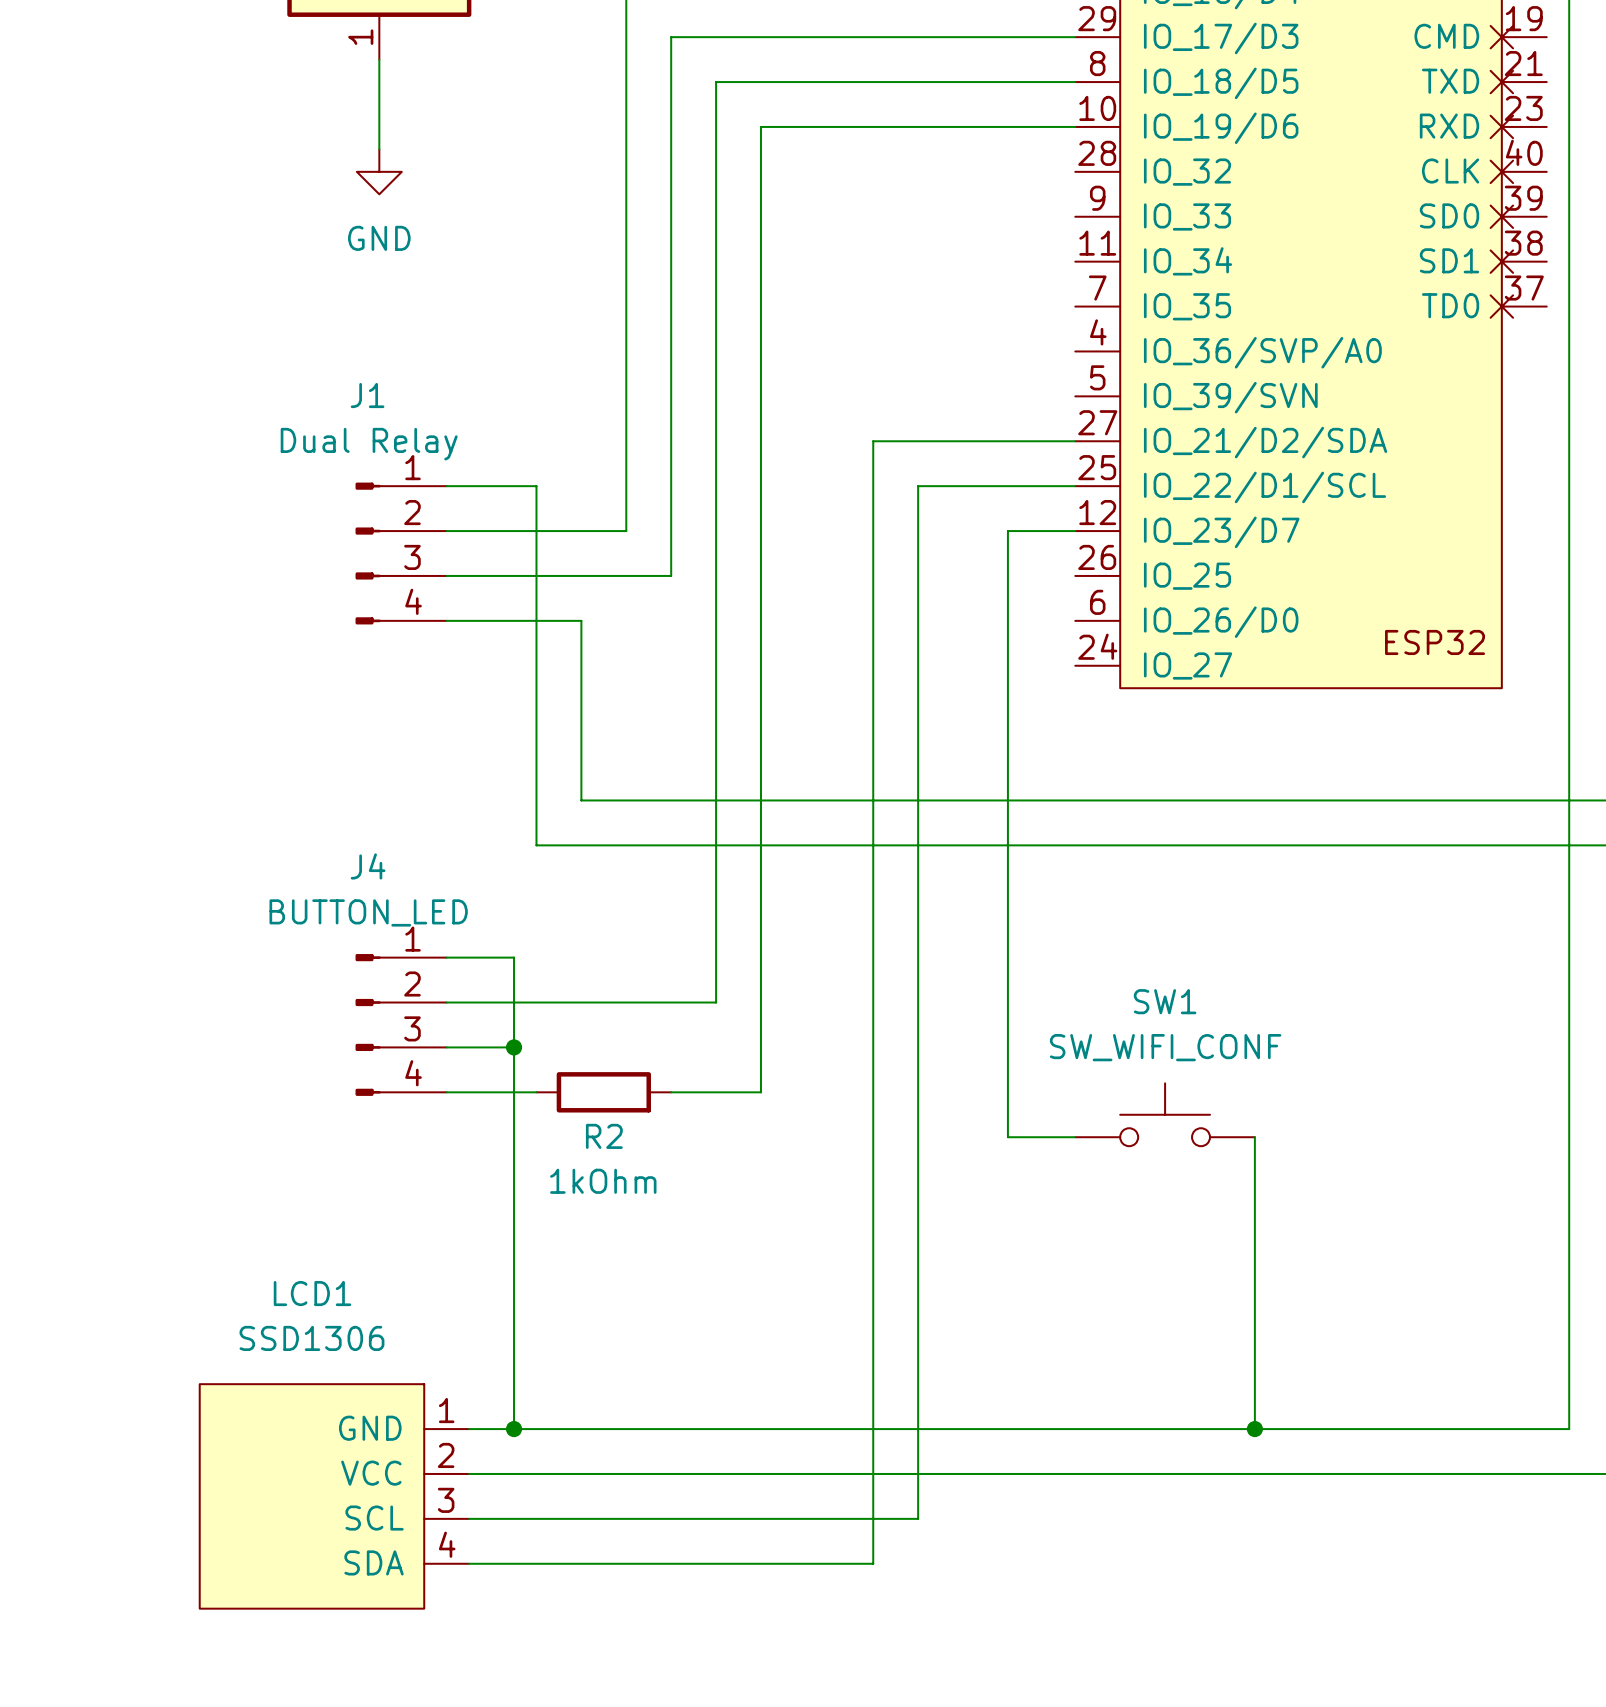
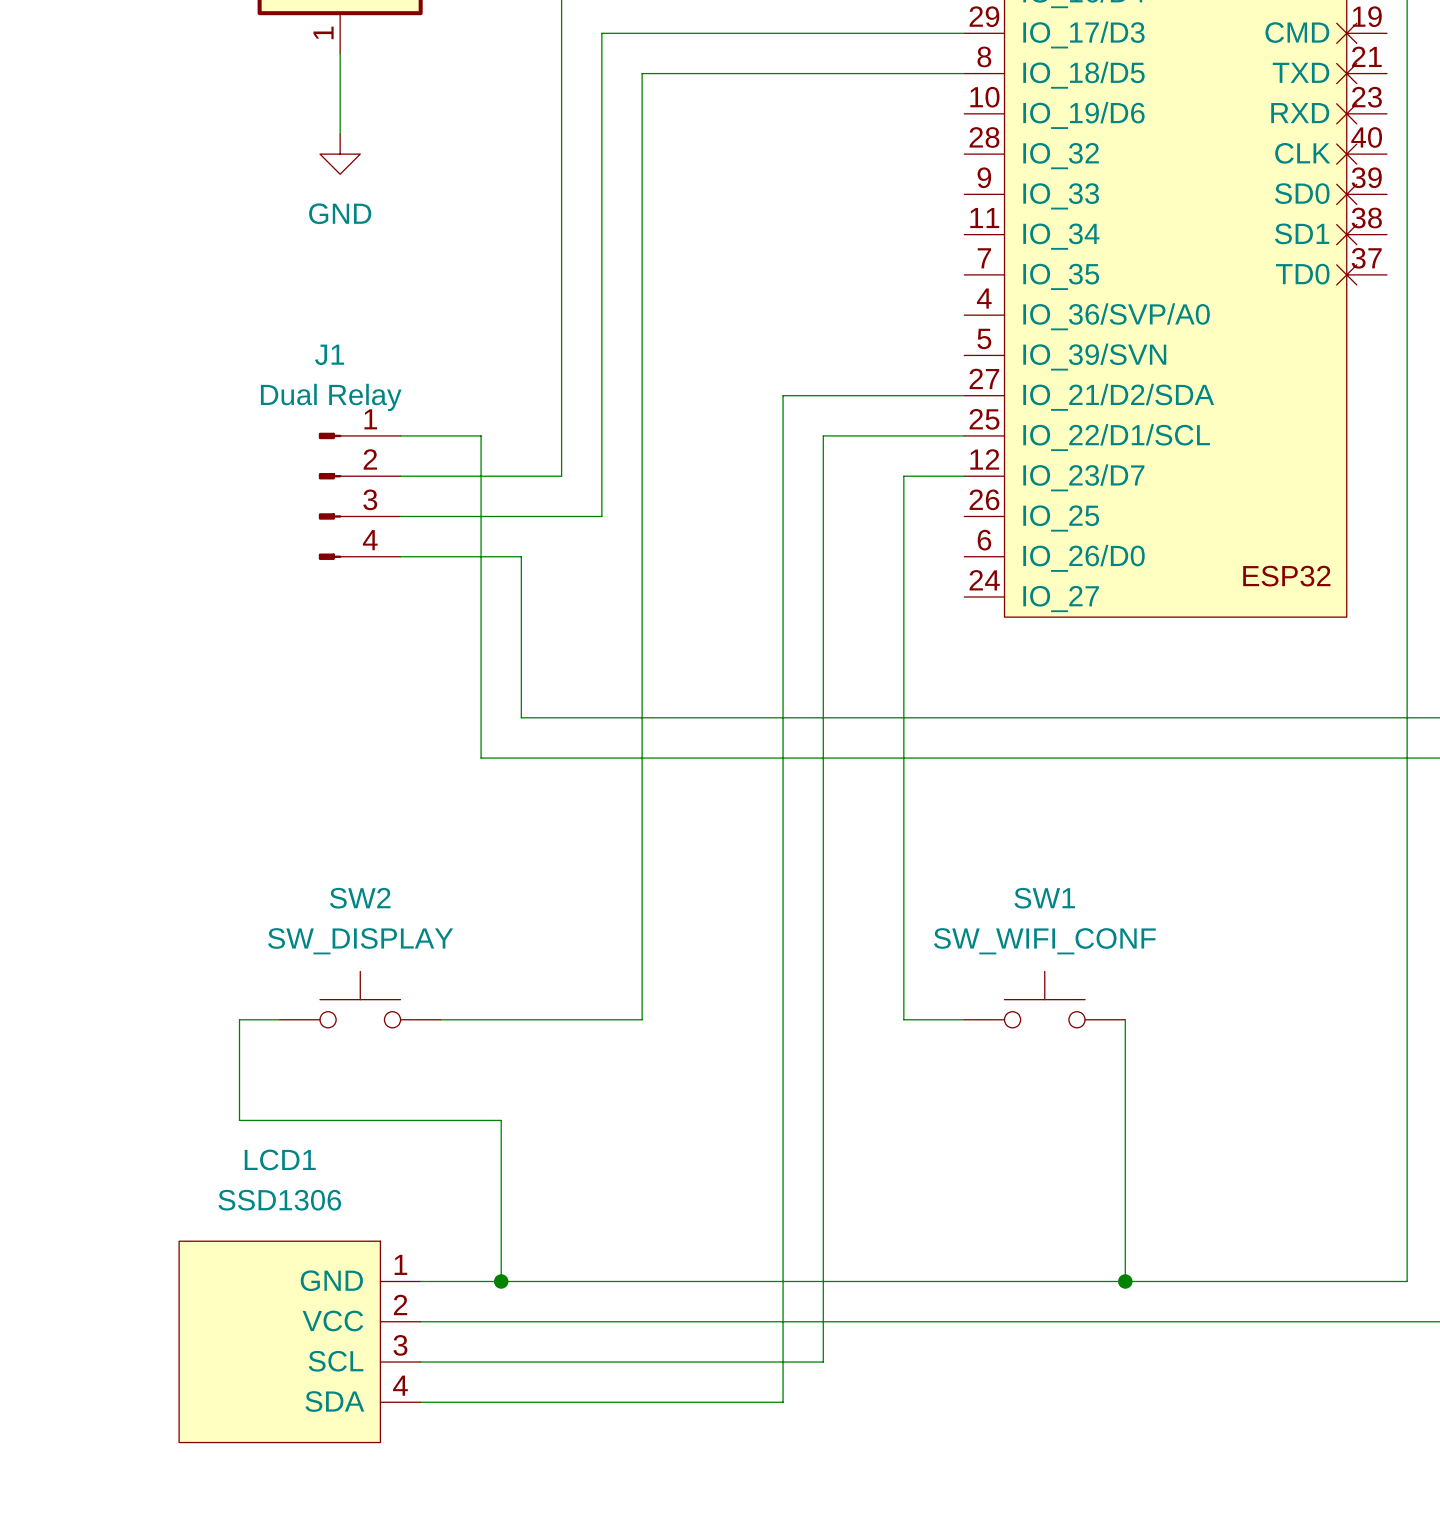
wire: (1075, 126) (760, 126) (760, 1092) (671, 1092) -> none
wire: (446, 957) (514, 957) (514, 1429) -> none
wire: (446, 1002) (716, 1002) -> (440, 1019) (642, 1019) (642, 898)
J4: BUTTON_LED (401, 1024) -> none
wire: (446, 1047) (514, 1047) -> none
junction: (514, 1047) -> none
wire: (446, 1092) (536, 1092) -> none
R2: 1kOhm (603, 1092) -> none
SW2: none -> SW_DISPLAY (360, 999)
wire: none -> (279, 1019) (239, 1019) (239, 1120) (501, 1120) (501, 1281)
junction position: (514, 1429) -> (501, 1281)

